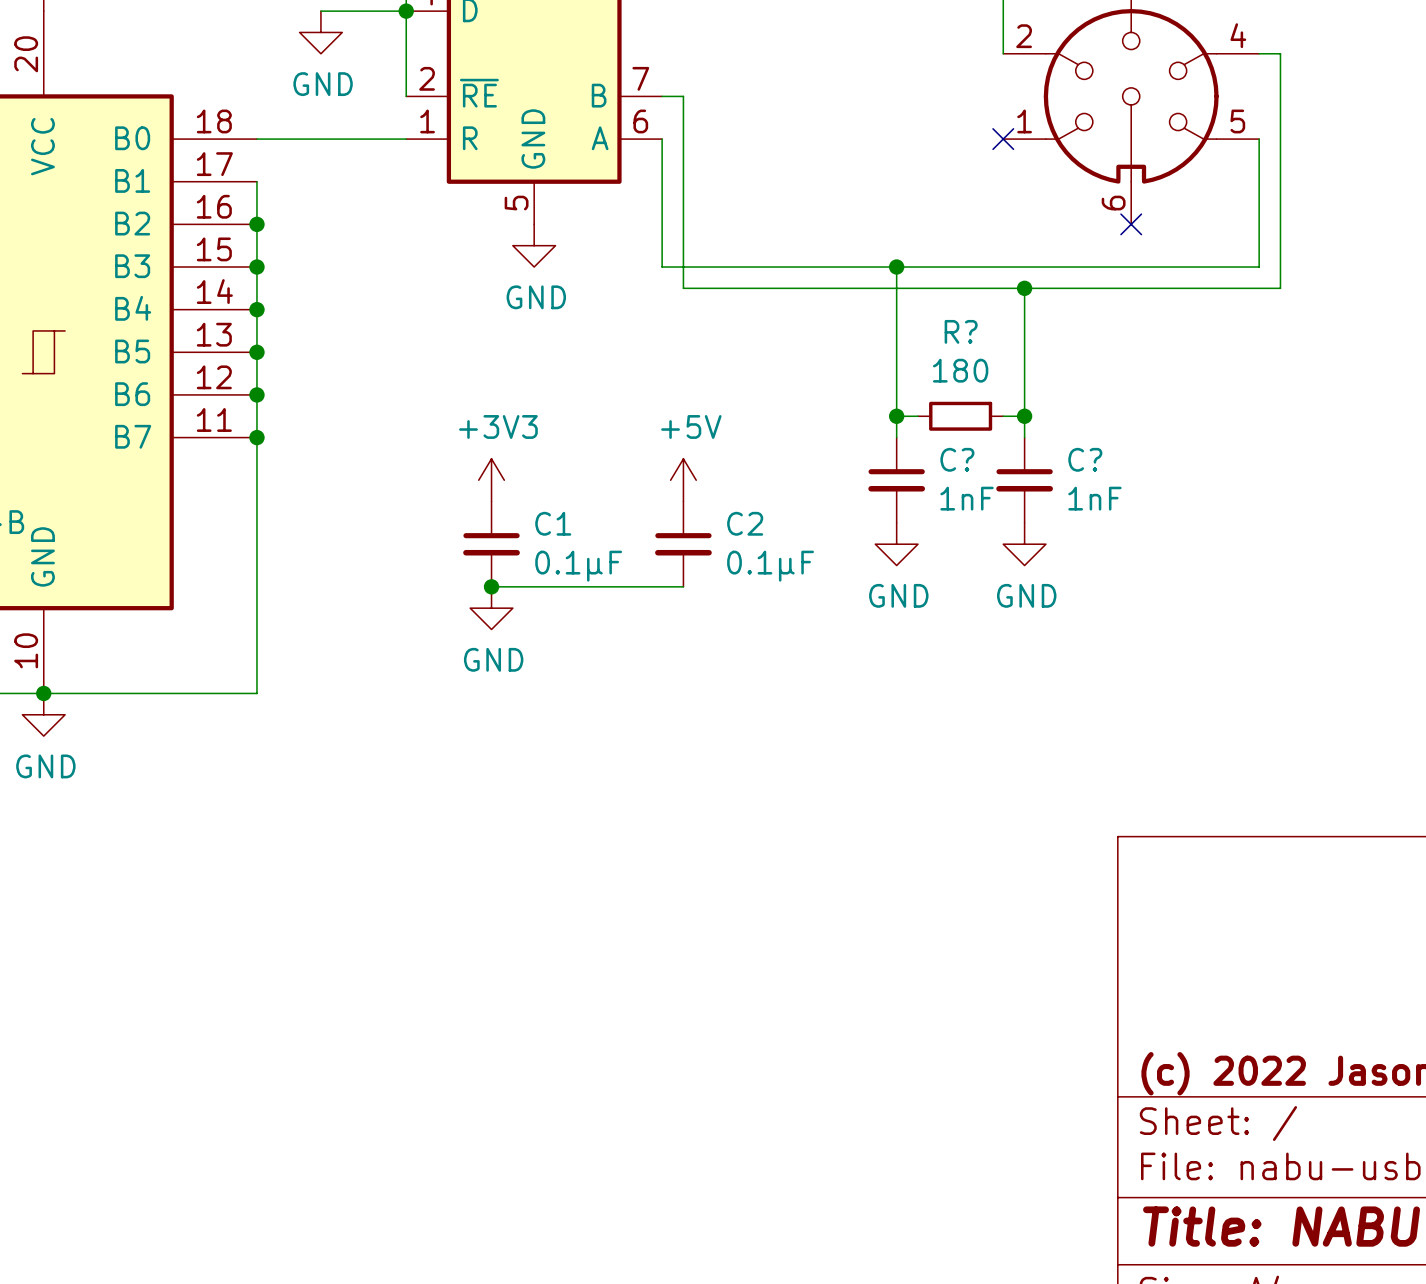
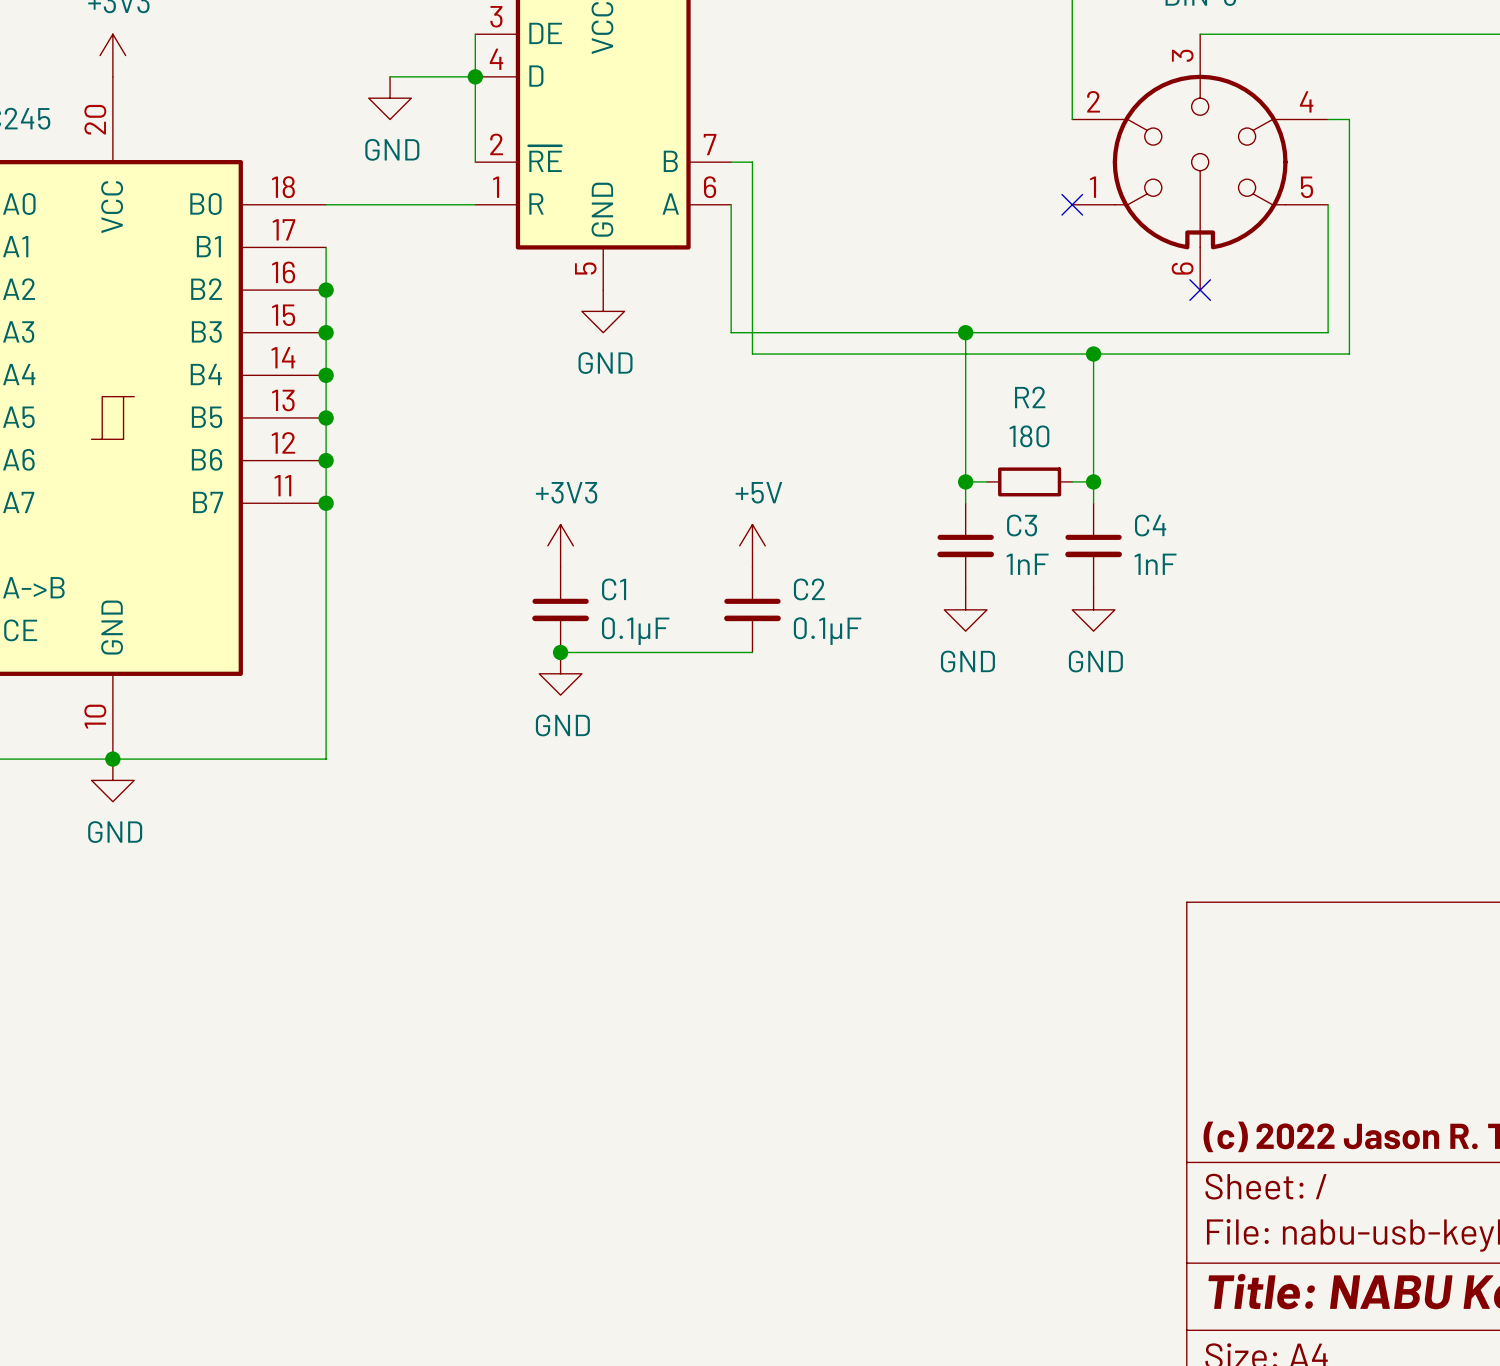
R? name: R? (961, 331) -> R2 (1030, 397)
C? name: C? (957, 459) -> C3 (1022, 525)
C? name: C? (1085, 459) -> C4 (1150, 525)

